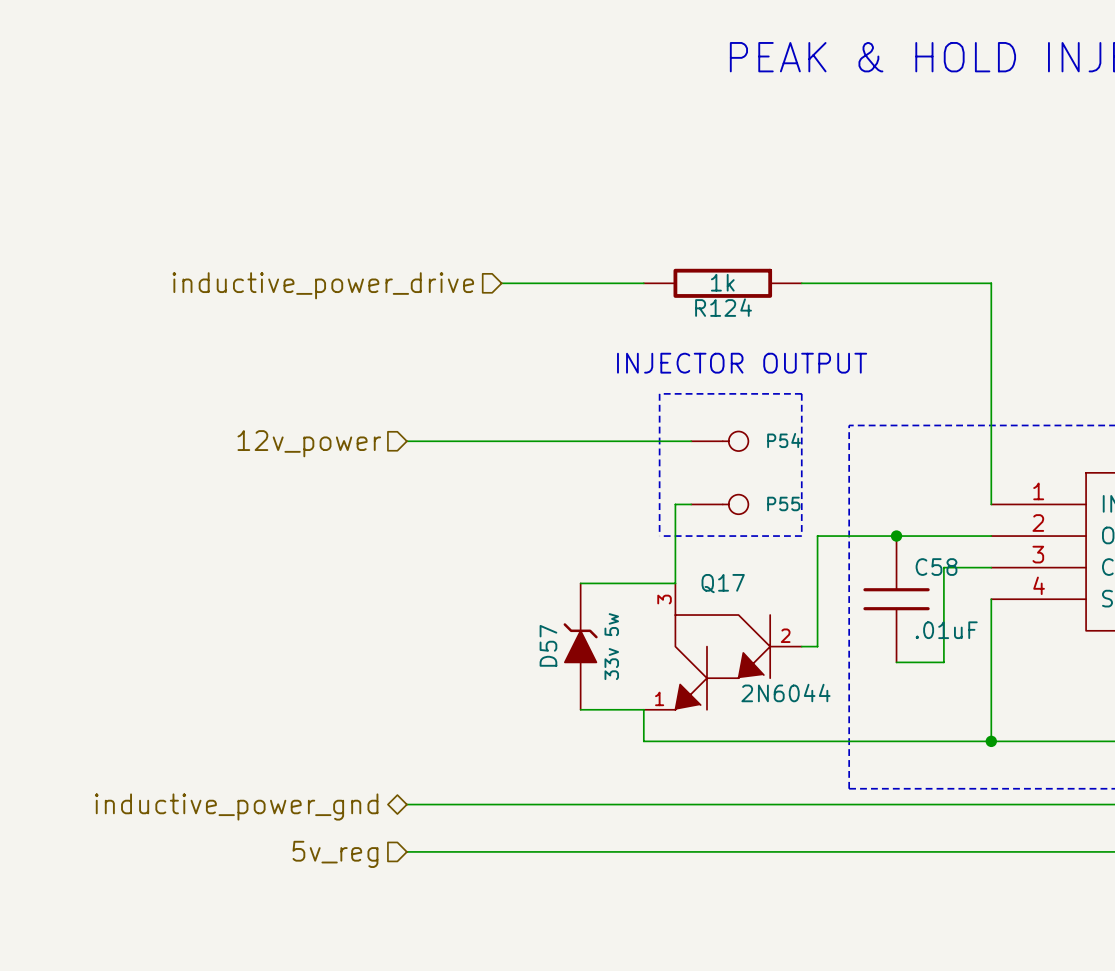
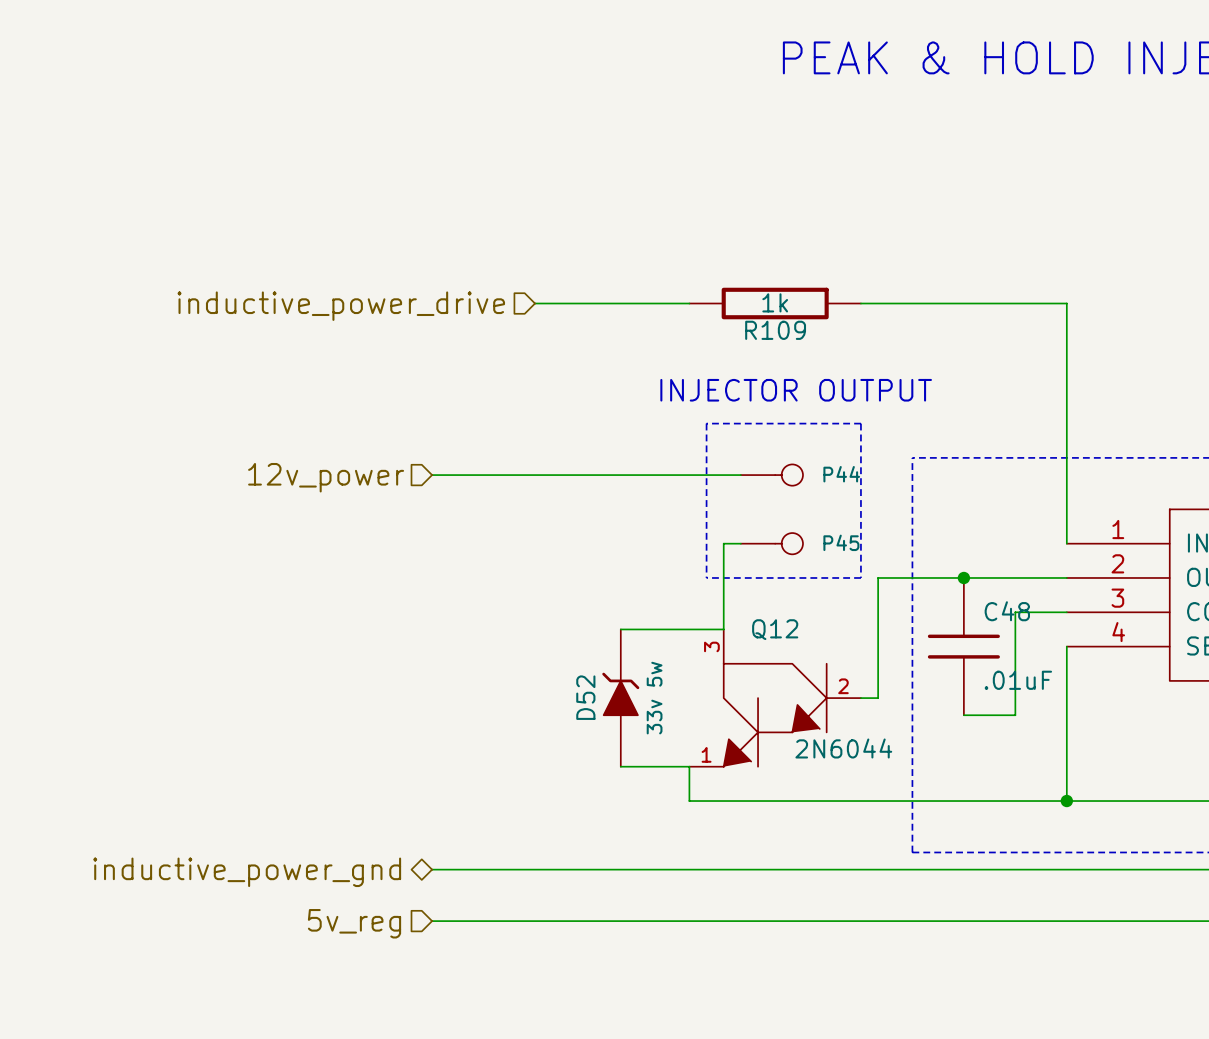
R124 name: R124 (723, 307) -> R109 (775, 330)
P54 name: P54 (784, 440) -> P44 (841, 474)
P55 name: P55 (783, 503) -> P45 (841, 542)
C58 name: C58 (936, 567) -> C48 (1007, 611)
Q17 name: Q17 (723, 583) -> Q12 (775, 629)
D57 name: D57 (548, 645) -> D52 (585, 697)

